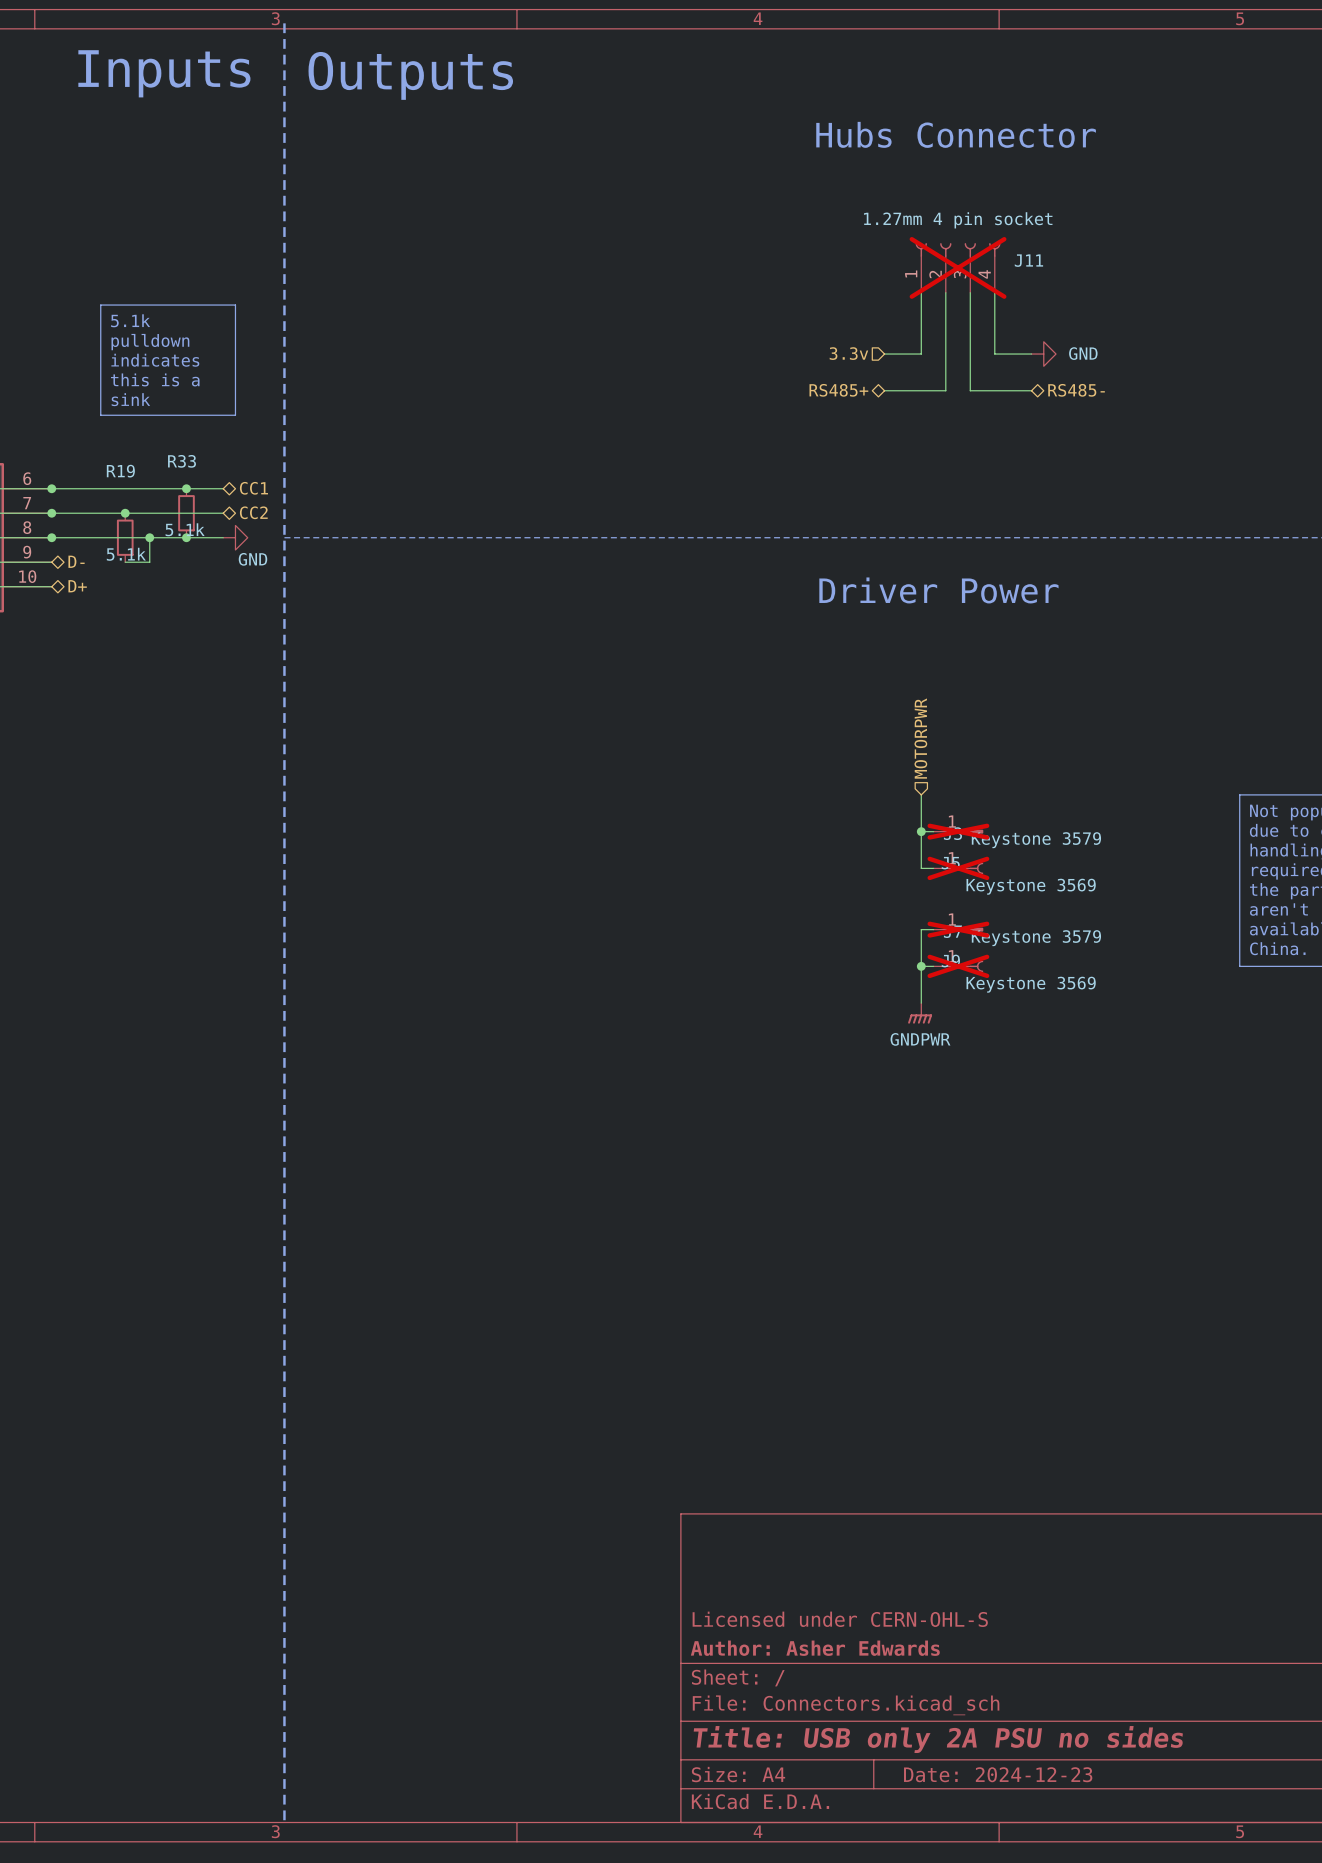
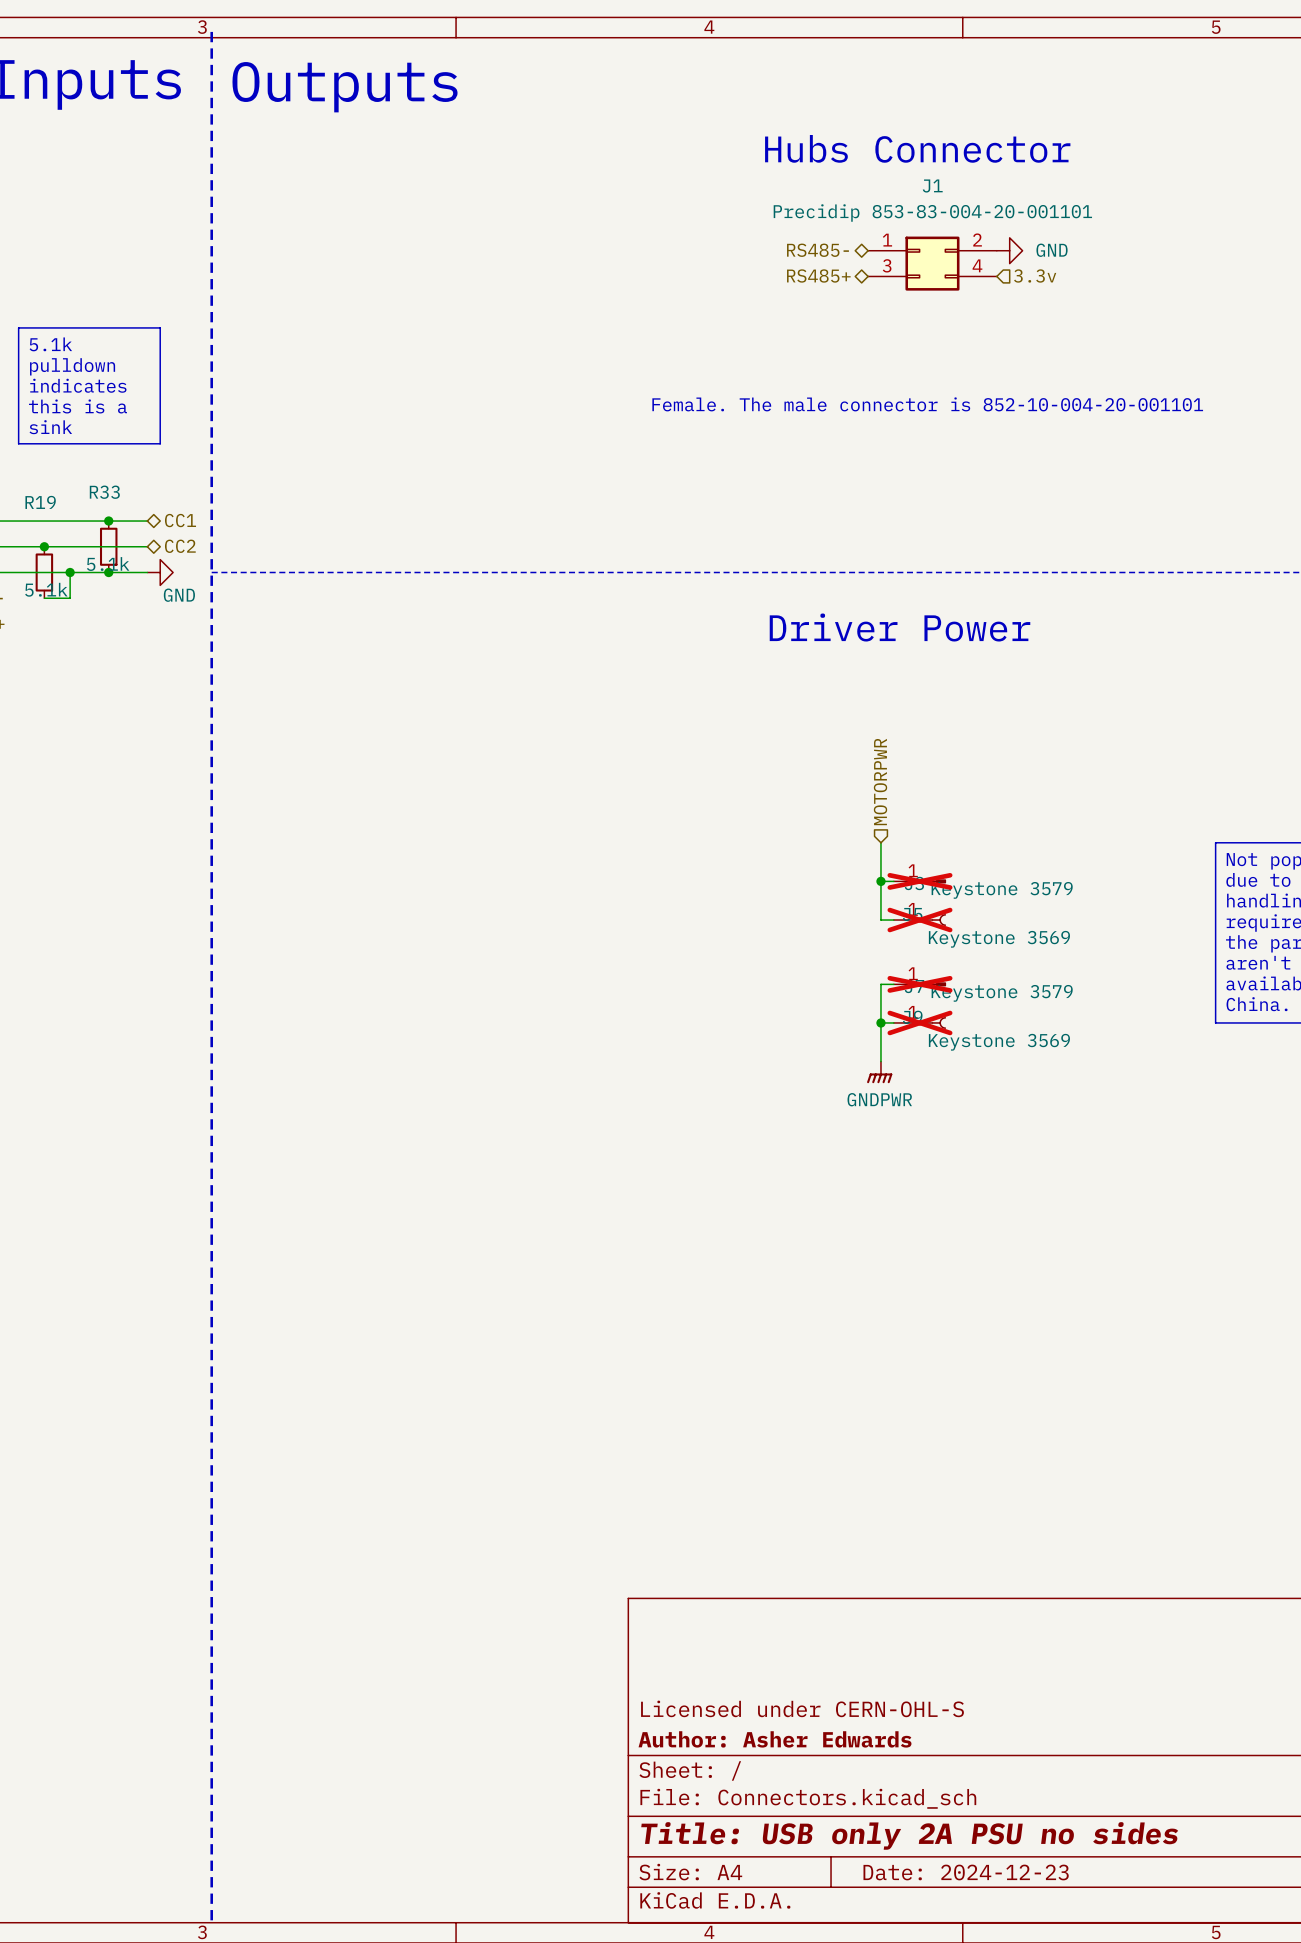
J1: none -> Precidip 853-83-004-20-001101 (932, 263)
J11: 1.27mm 4 pin socket (958, 267) -> none
wire: (921, 292) (921, 354) (884, 354) -> none
wire: (945, 292) (945, 390) (884, 390) -> none
wire: (970, 292) (970, 390) (1031, 390) -> none
wire: (994, 292) (994, 354) (1031, 354) -> none
hierarchical label rotation: 0° (848, 353) -> 180° (1035, 275)
hierarchical label position: 3.3v (848, 353) -> 3.3v (1035, 275)
power symbol position: GND (1043, 354) -> GND (1009, 250)
text: none -> Female. The male connector is 852-10-004-20-001101 (927, 404)
hierarchical label position: RS485+ (838, 390) -> RS485+ (818, 275)
hierarchical label rotation: 0° (1076, 390) -> 180° (817, 250)
hierarchical label position: RS485- (1076, 390) -> RS485- (817, 250)

